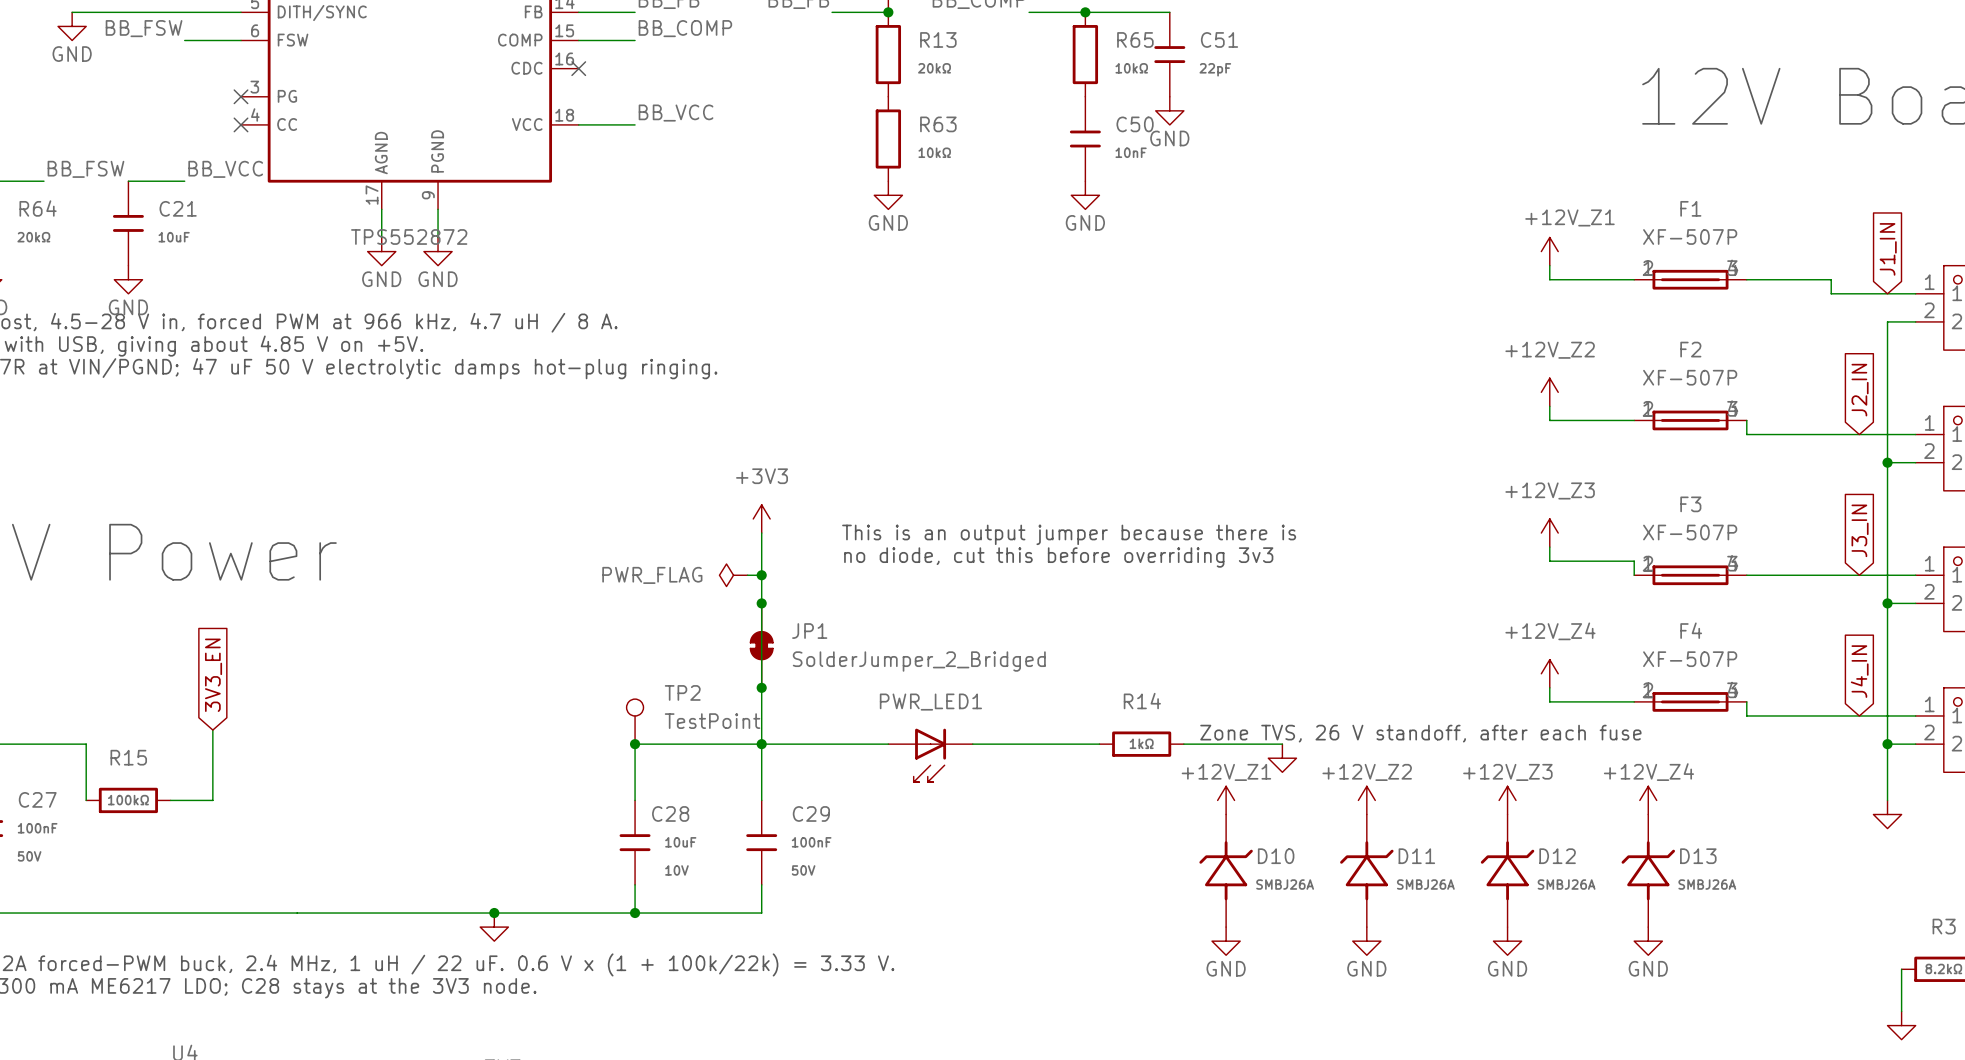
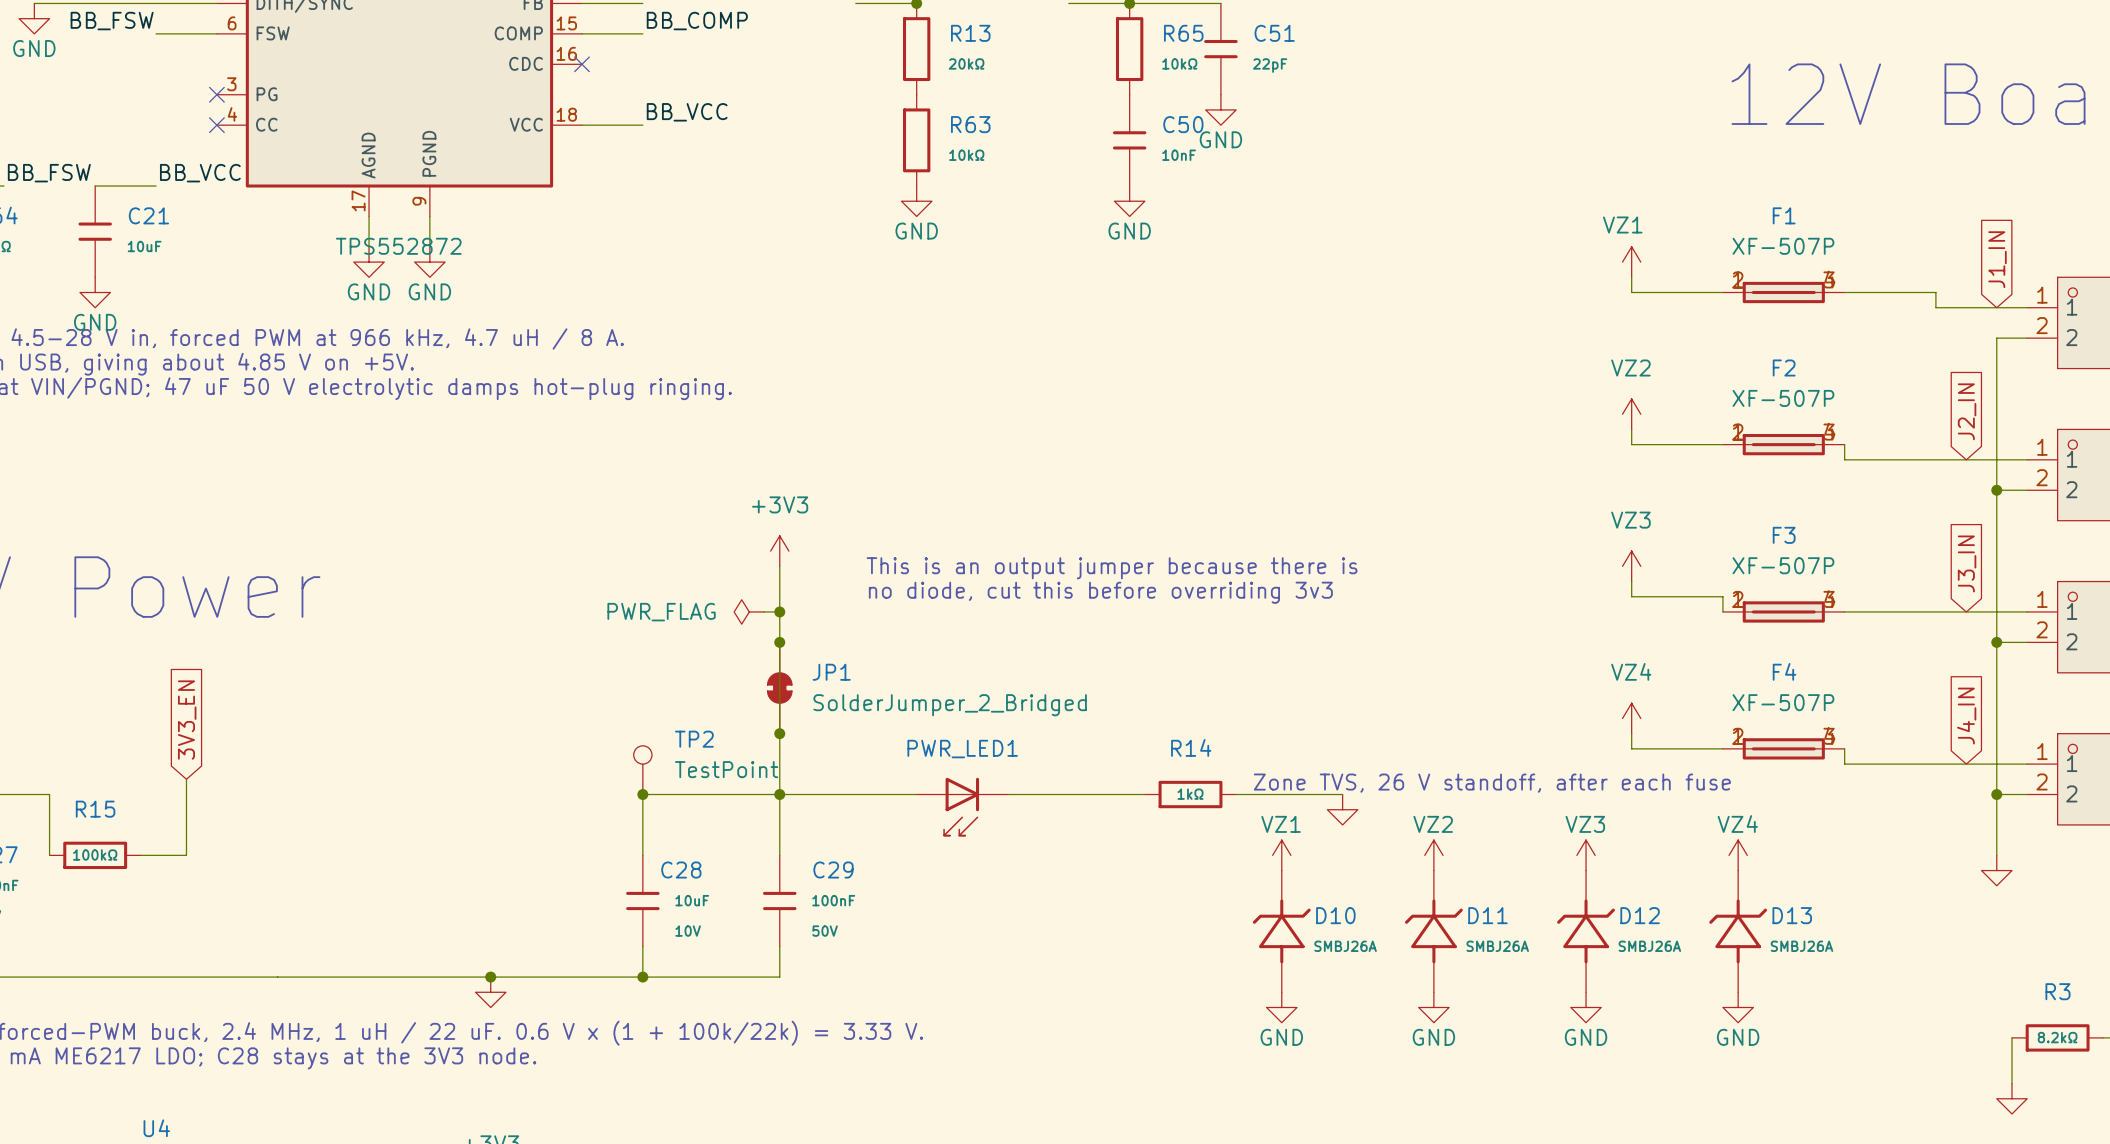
power symbol: +12V_Z1 (1549, 251) -> VZ1 (1631, 262)
power symbol: +12V_Z2 (1549, 392) -> VZ2 (1631, 414)
power symbol: +12V_Z3 (1549, 533) -> VZ3 (1631, 566)
power symbol: +12V_Z4 (1549, 673) -> VZ4 (1631, 718)
power symbol: +12V_Z1 (1226, 800) -> VZ1 (1281, 855)
power symbol: +12V_Z2 (1366, 800) -> VZ2 (1433, 855)
power symbol: +12V_Z3 (1507, 800) -> VZ3 (1586, 855)
power symbol: +12V_Z4 (1648, 800) -> VZ4 (1738, 855)

